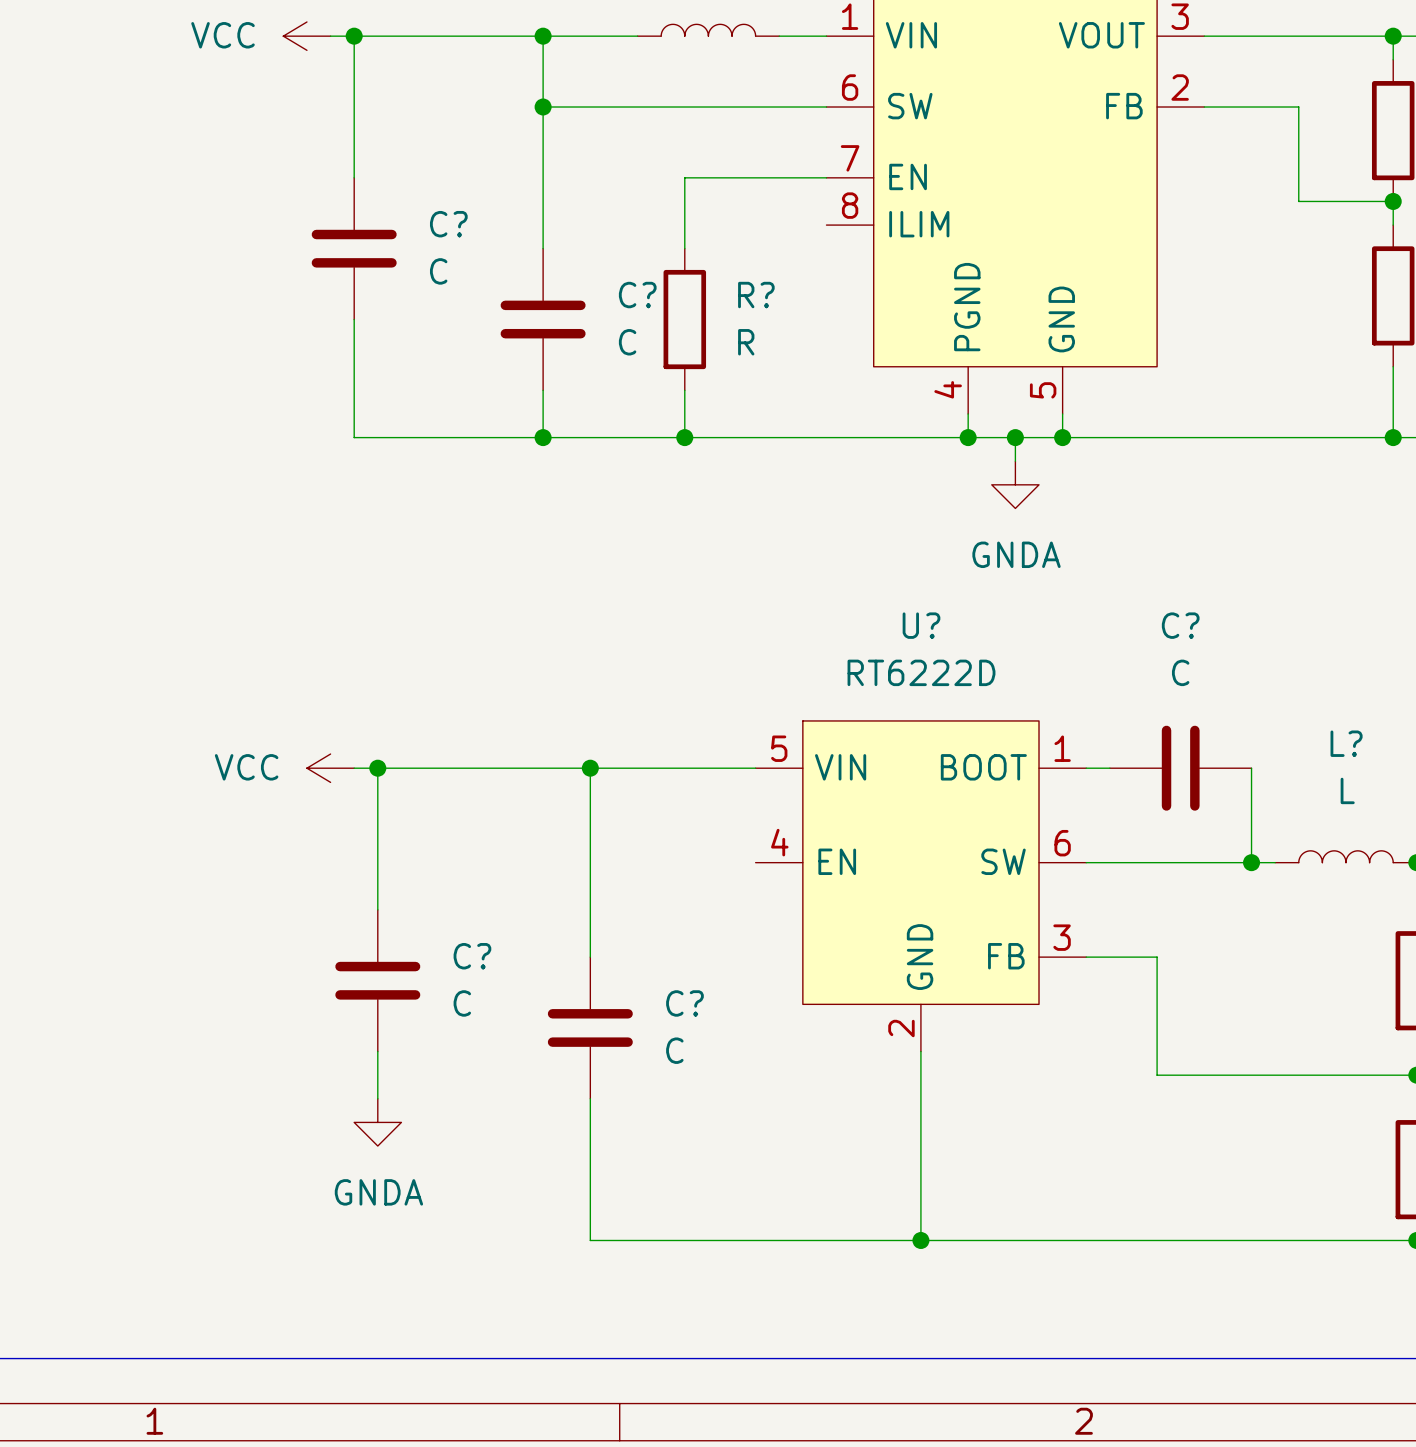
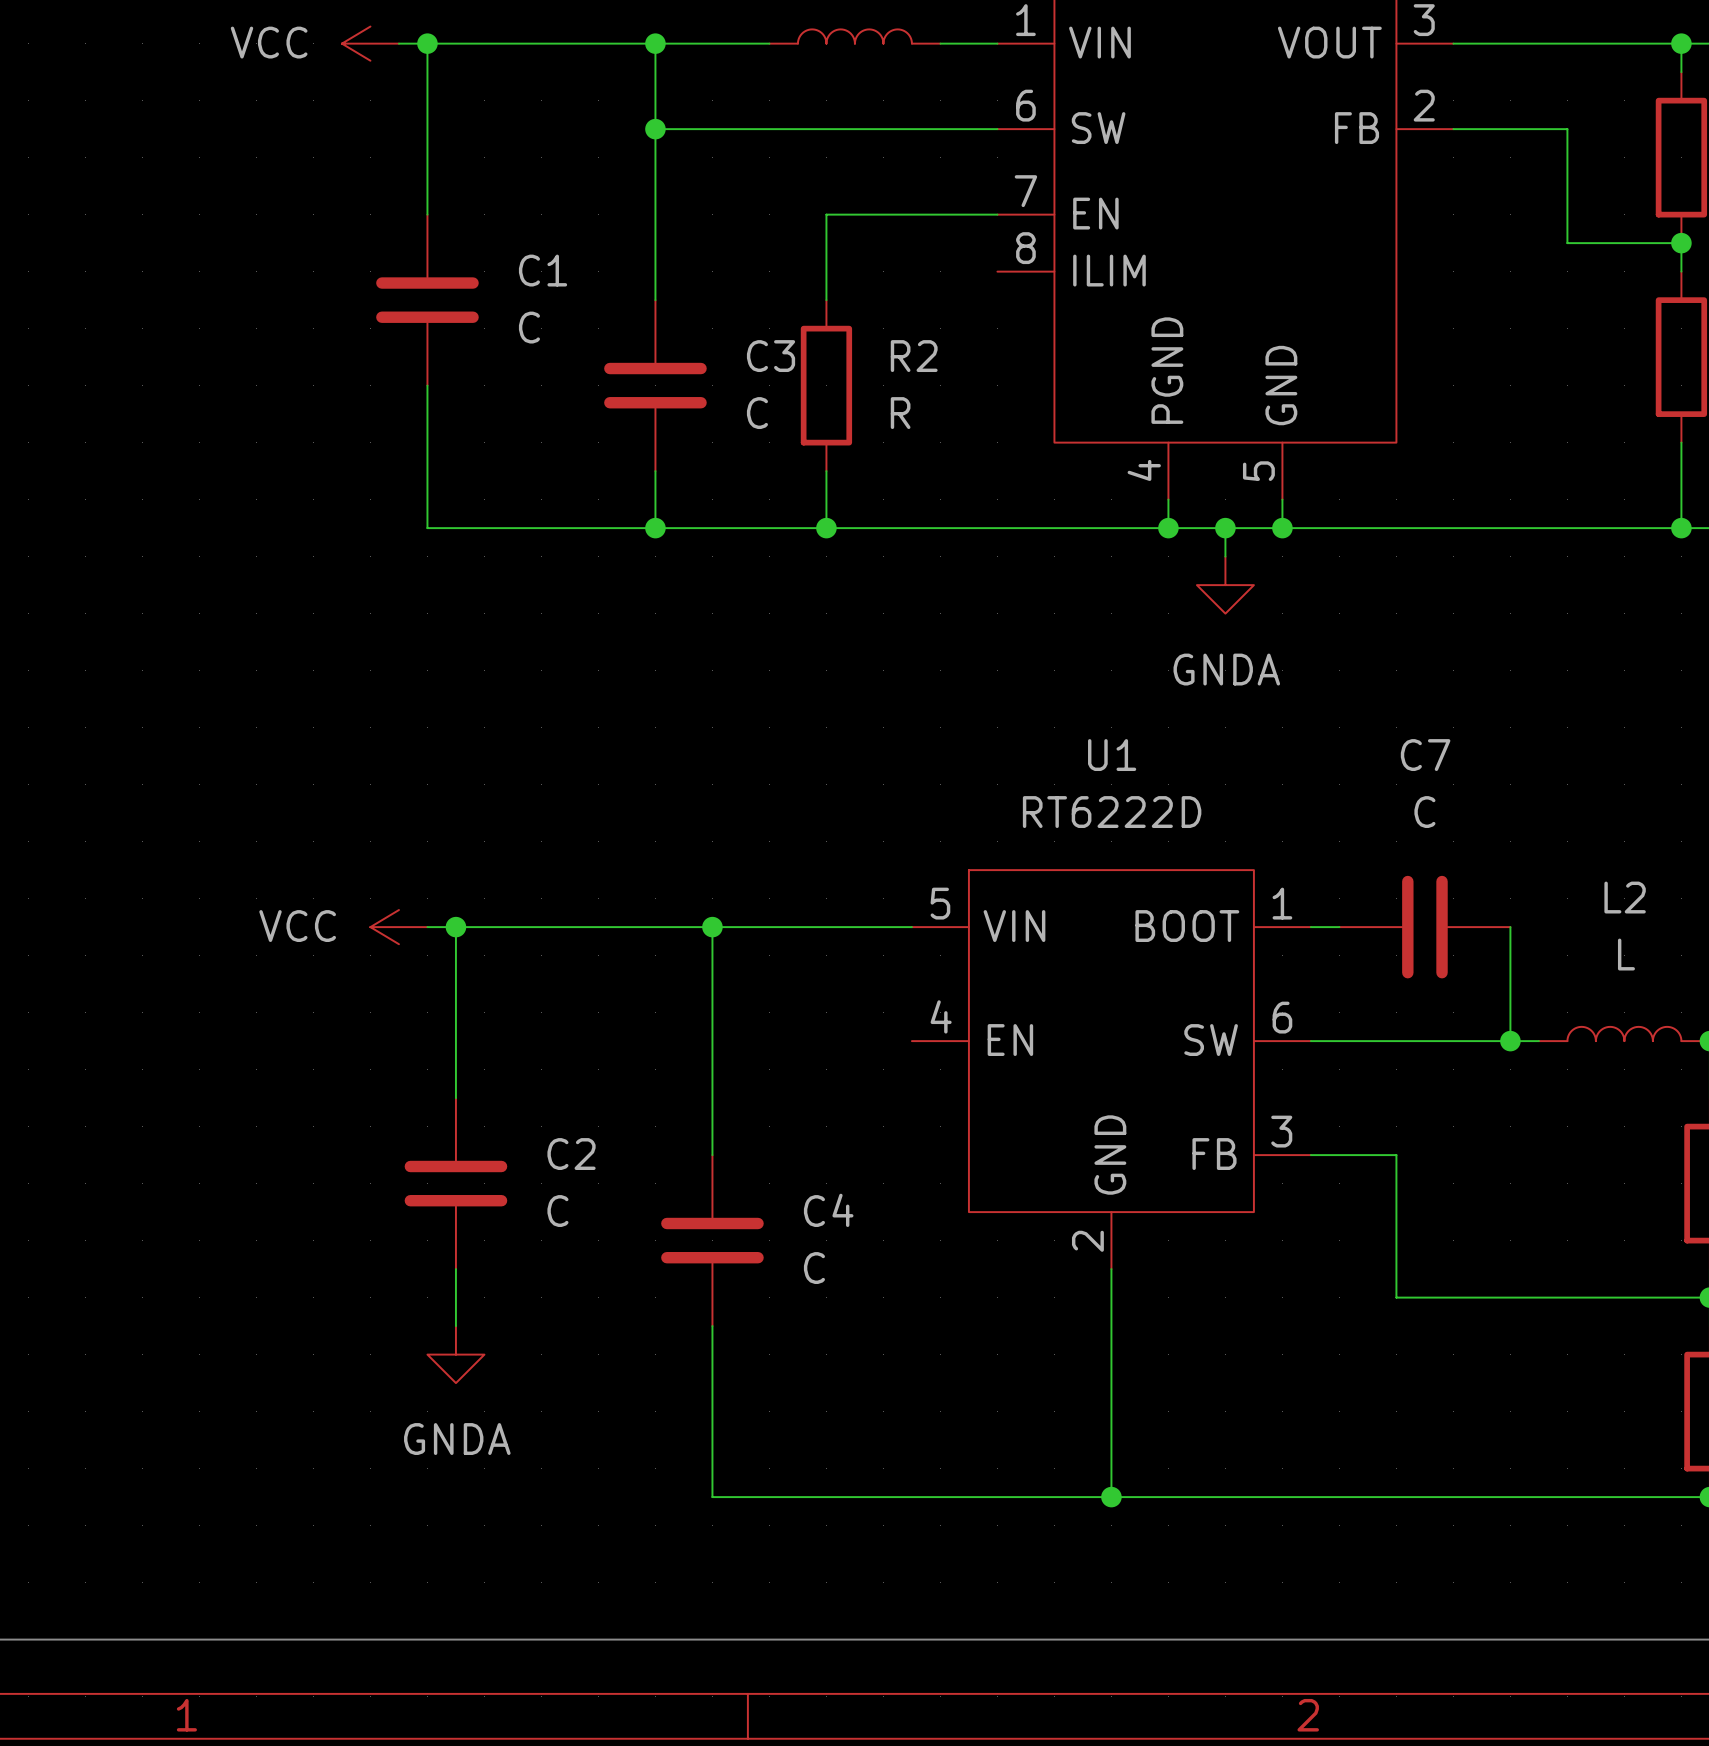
C? name: C? (448, 224) -> C1 (543, 270)
C? name: C? (637, 295) -> C3 (771, 356)
R? name: R? (756, 295) -> R2 (914, 356)
U? name: U? (921, 625) -> U1 (1112, 755)
C? name: C? (1180, 625) -> C7 (1425, 755)
L? name: L? (1346, 743) -> L2 (1625, 897)
C? name: C? (472, 956) -> C2 (571, 1154)
C? name: C? (684, 1003) -> C4 (828, 1210)

